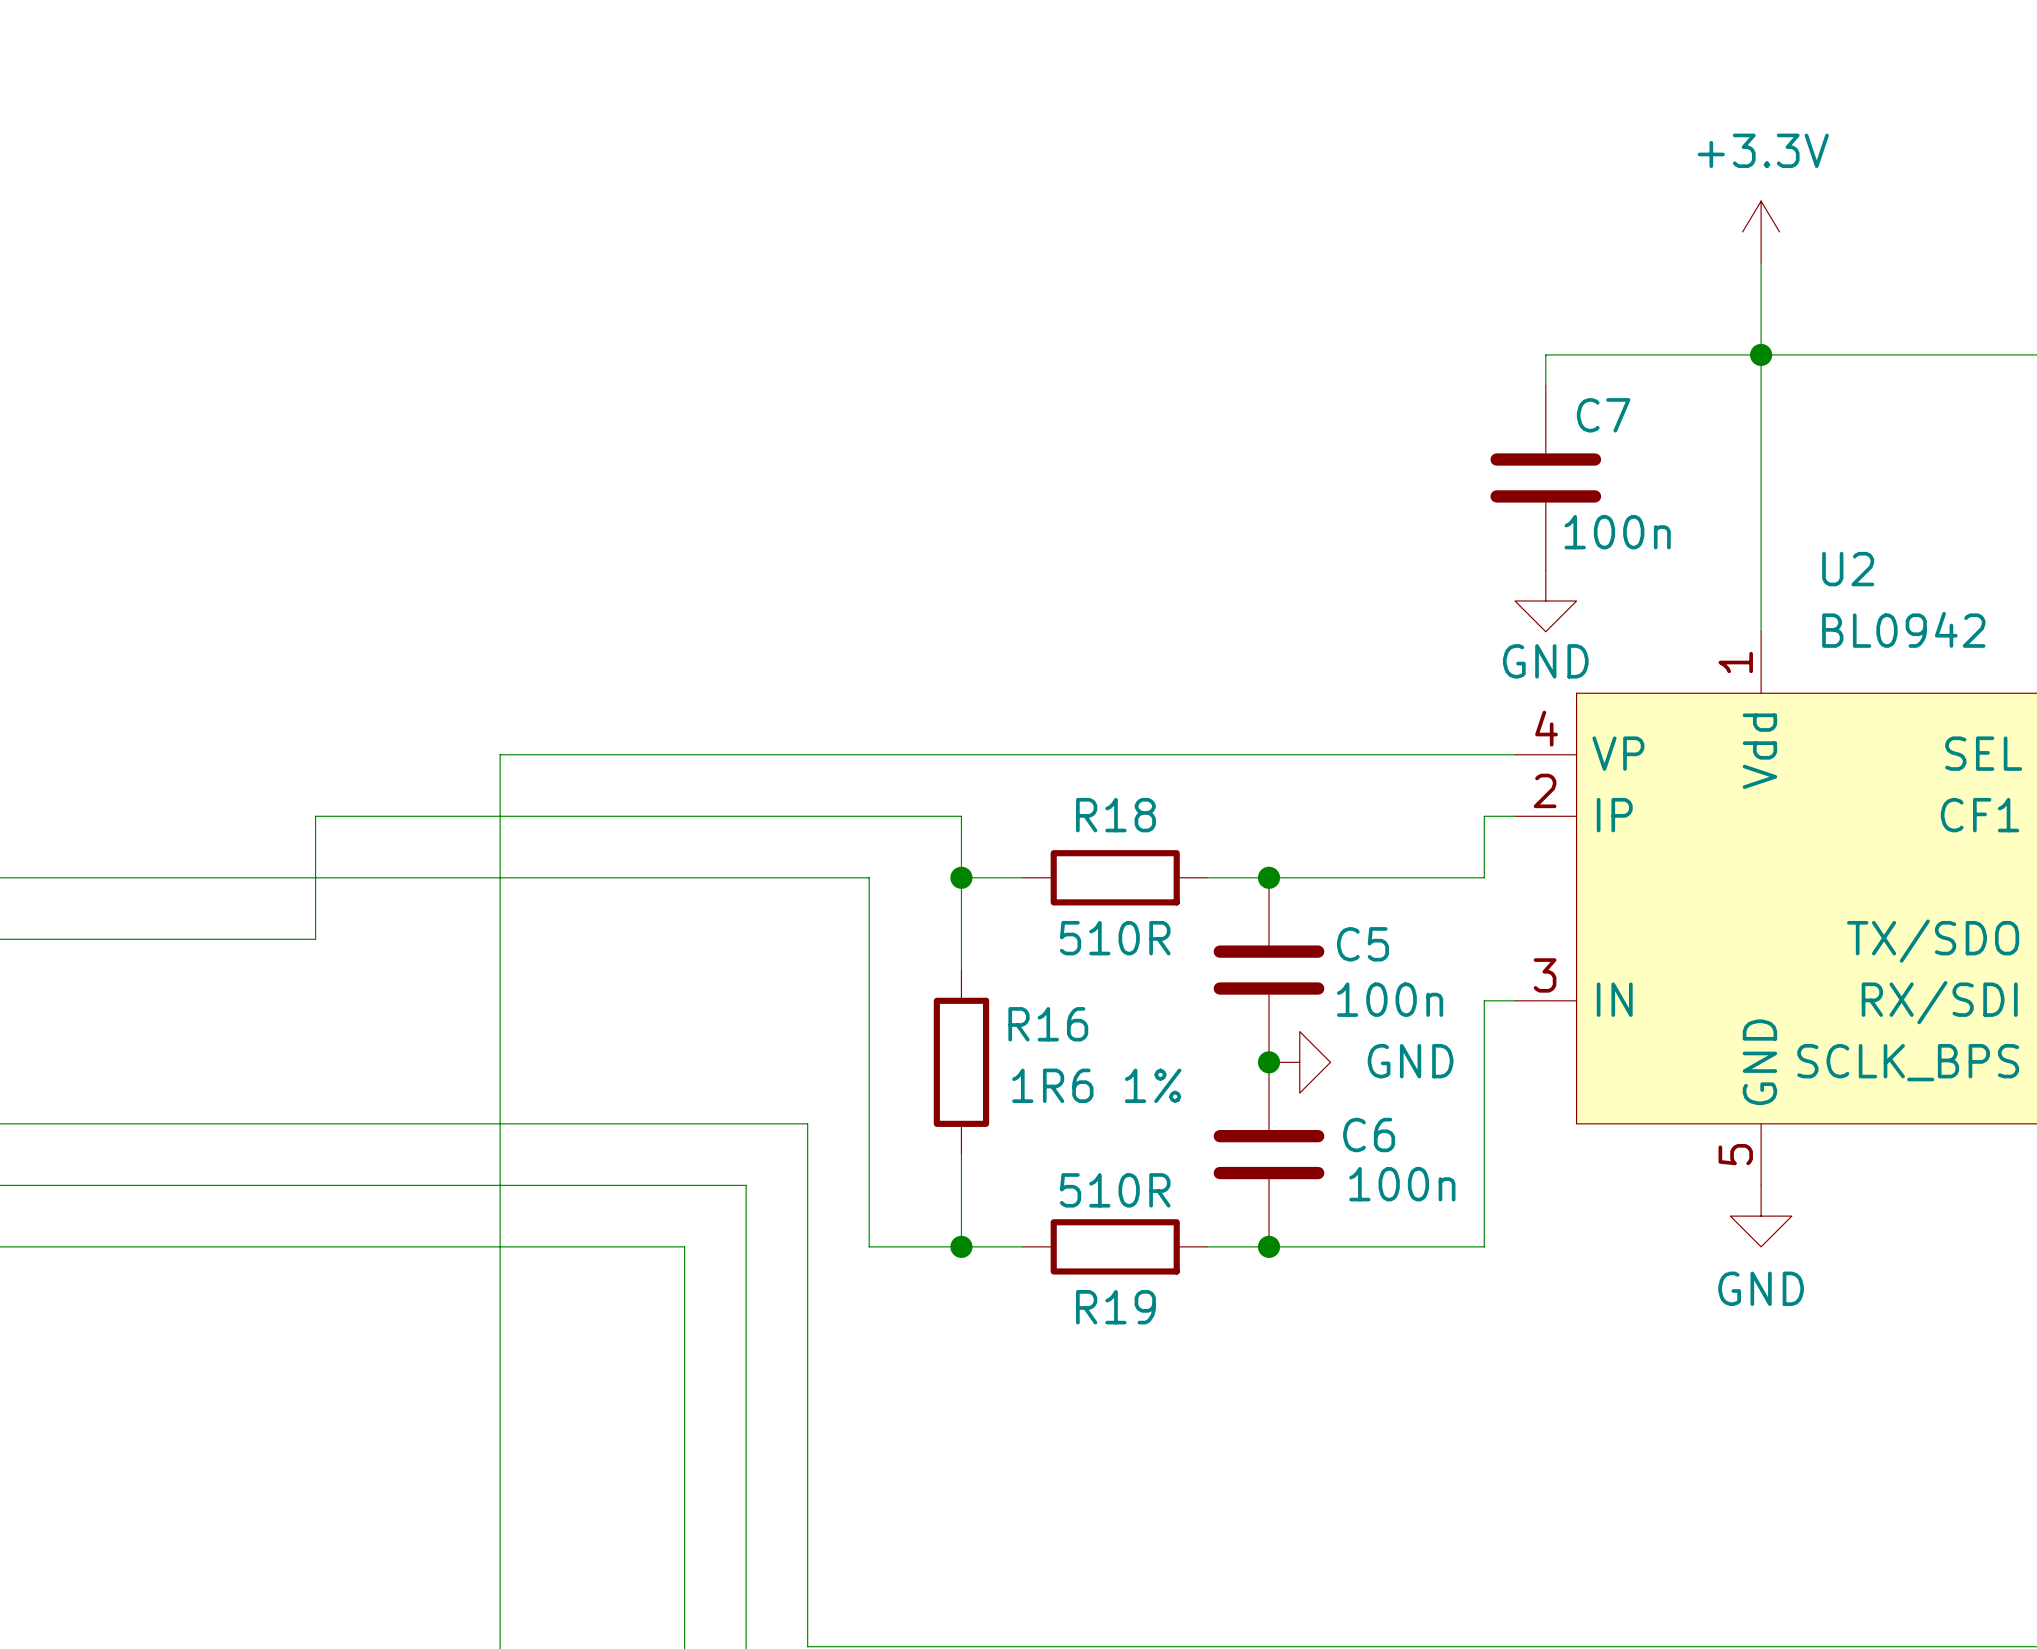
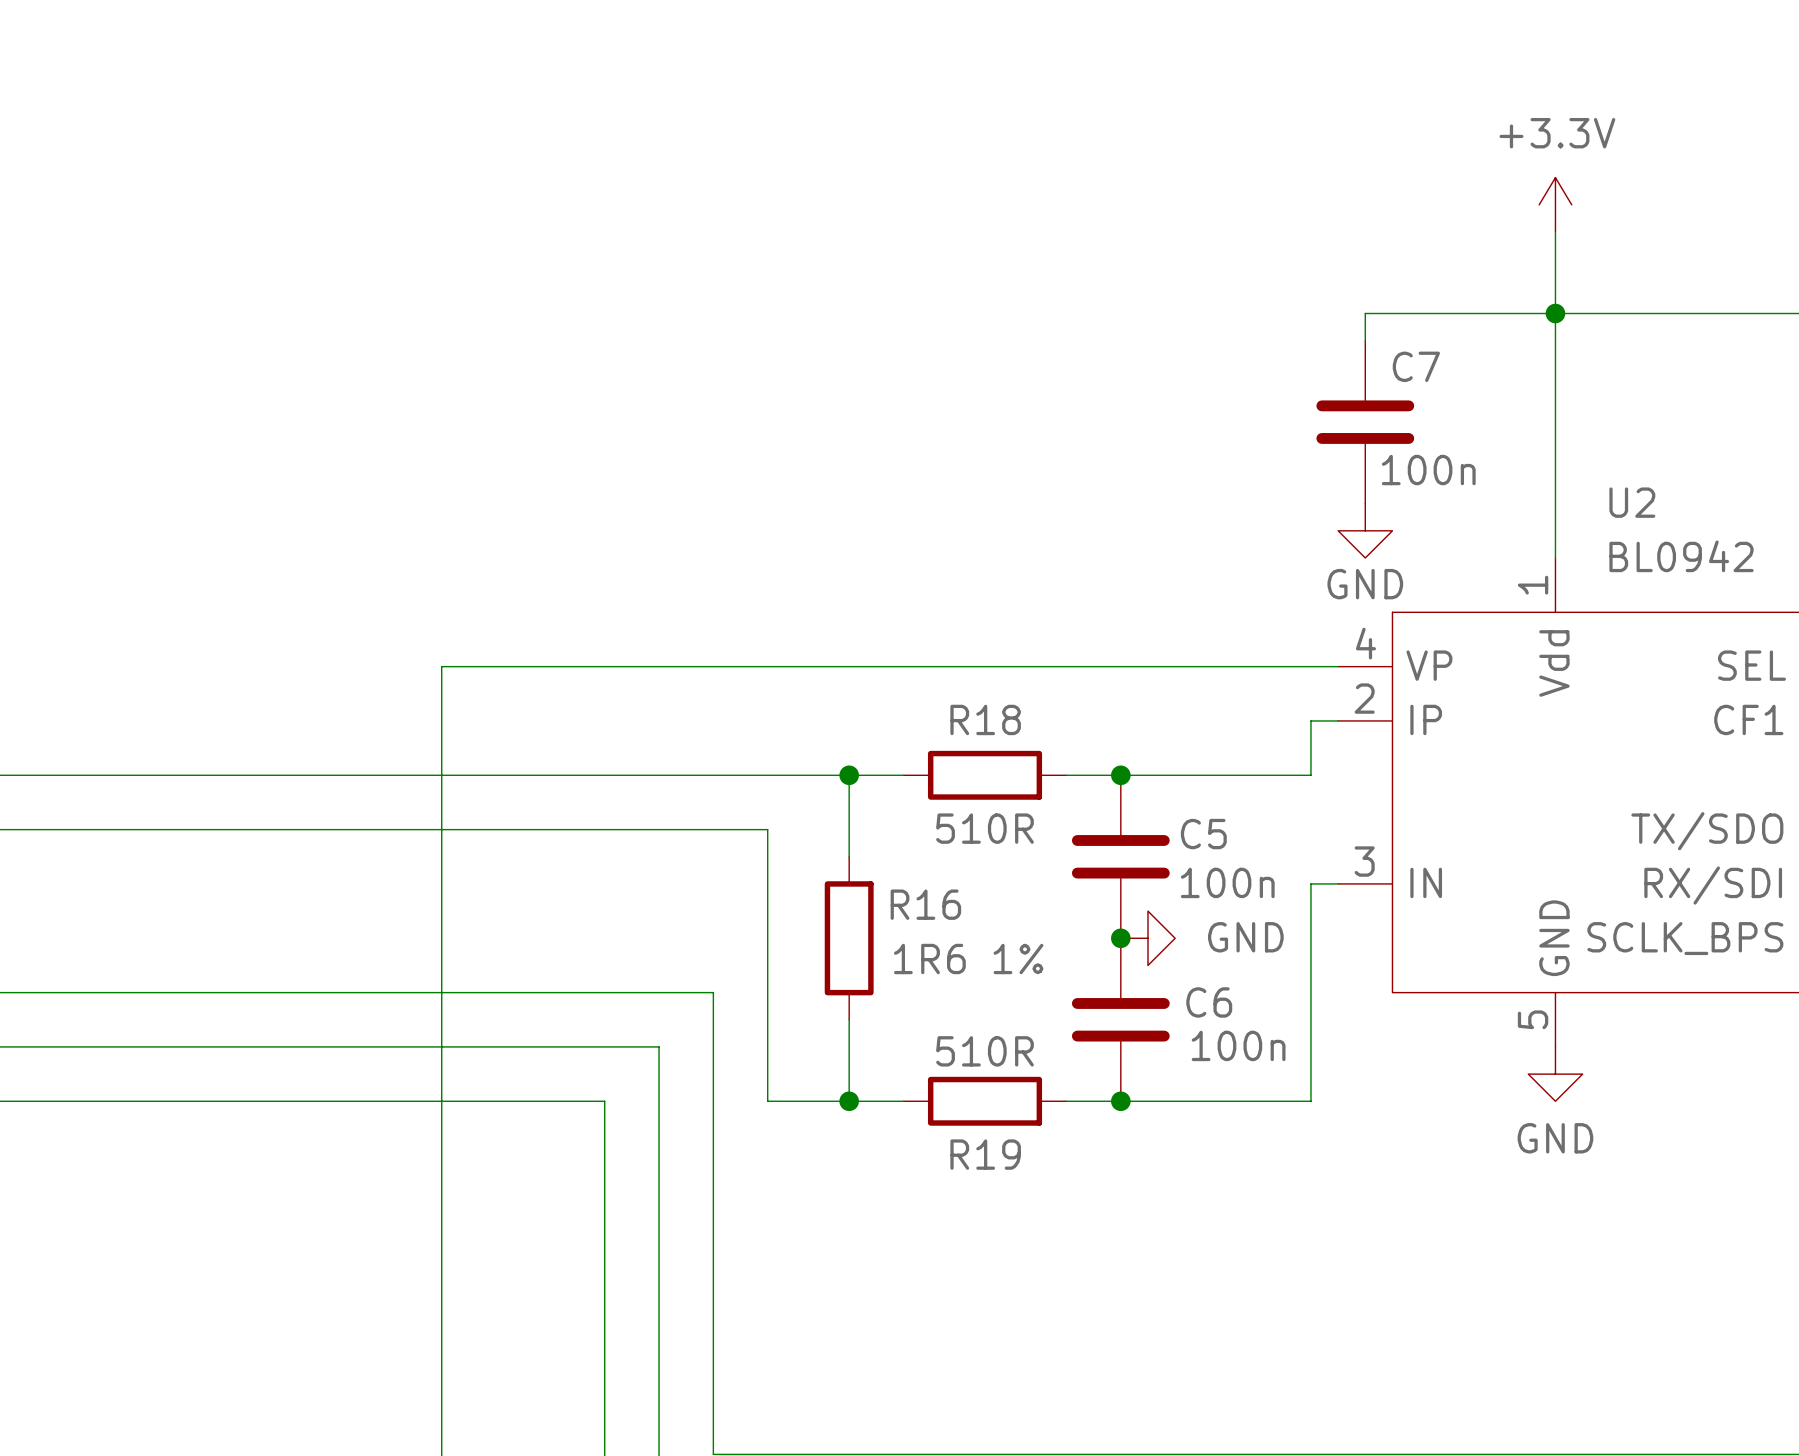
wire: (869, 877) (869, 939) -> (767, 775) (849, 775)
wire: (961, 877) (961, 816) (315, 816) (315, 939) -> (767, 829) (278, 829)

